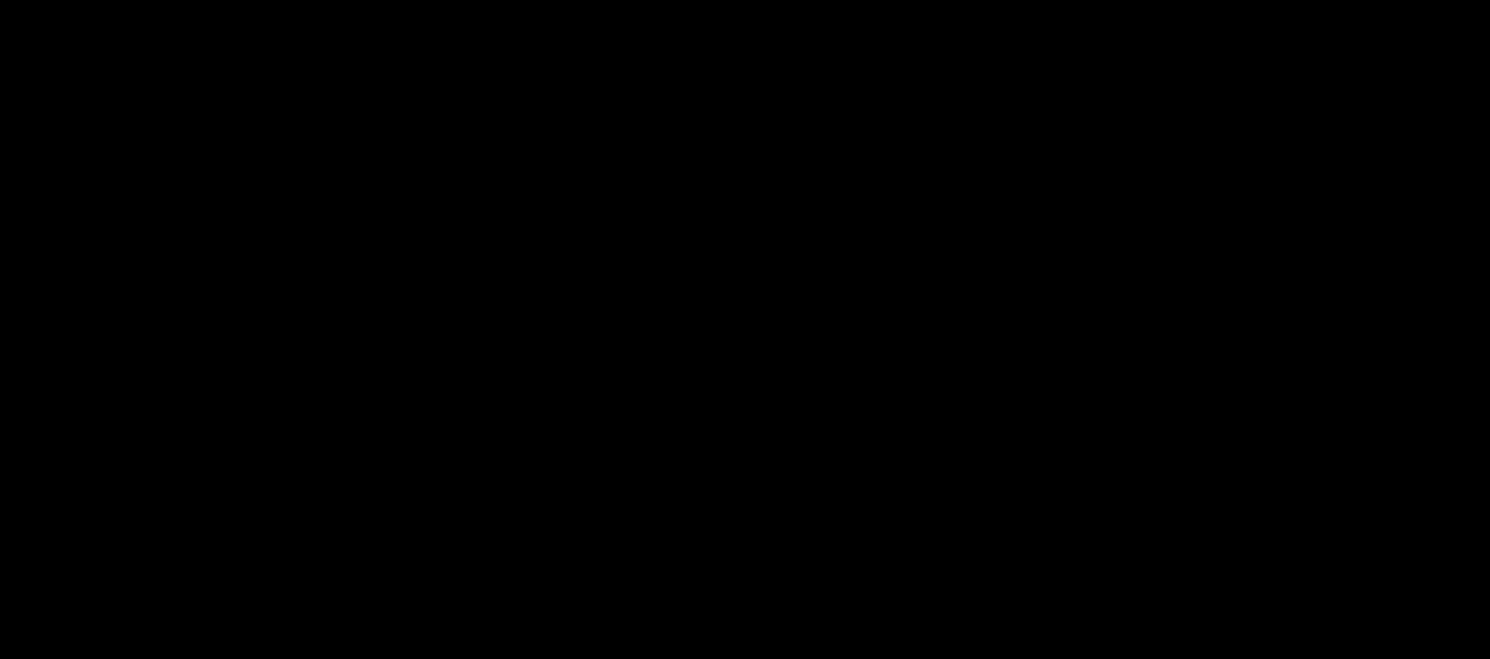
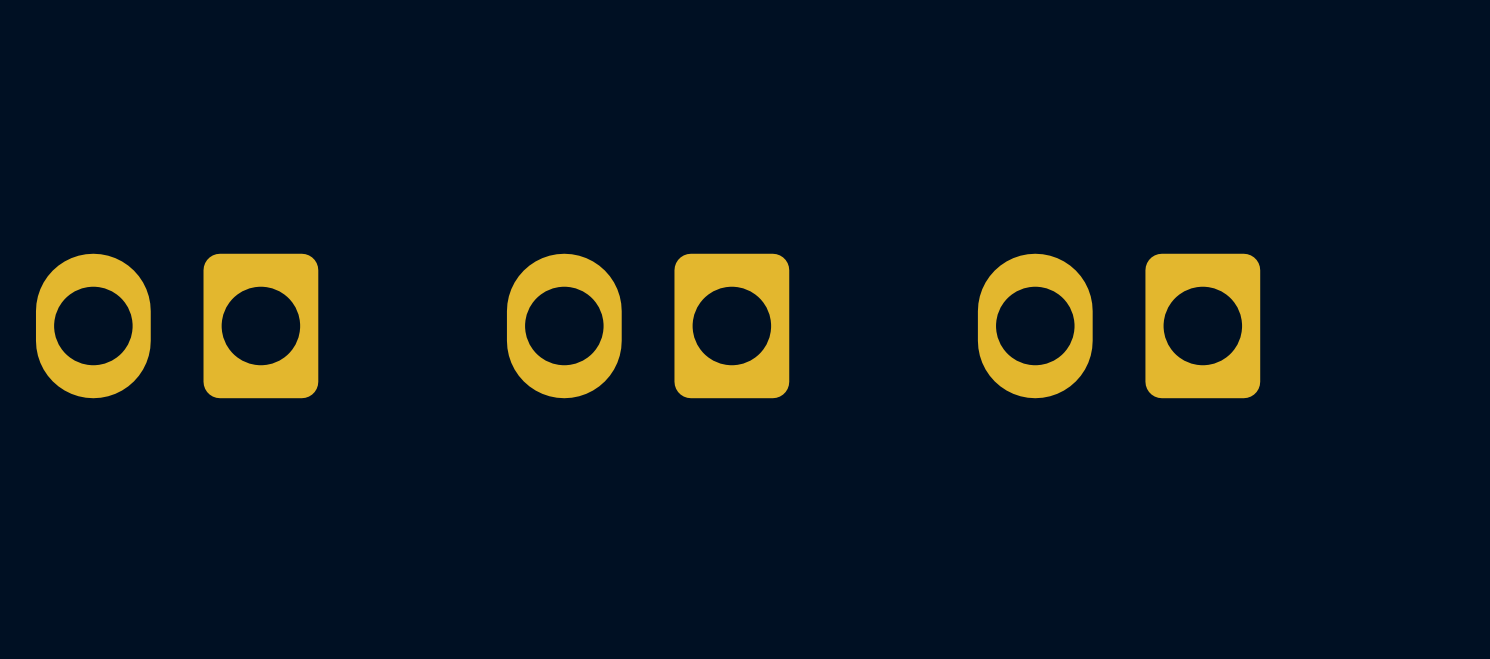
part: none -> (177, 325)
part: none -> (648, 325)
part: none -> (1119, 325)

